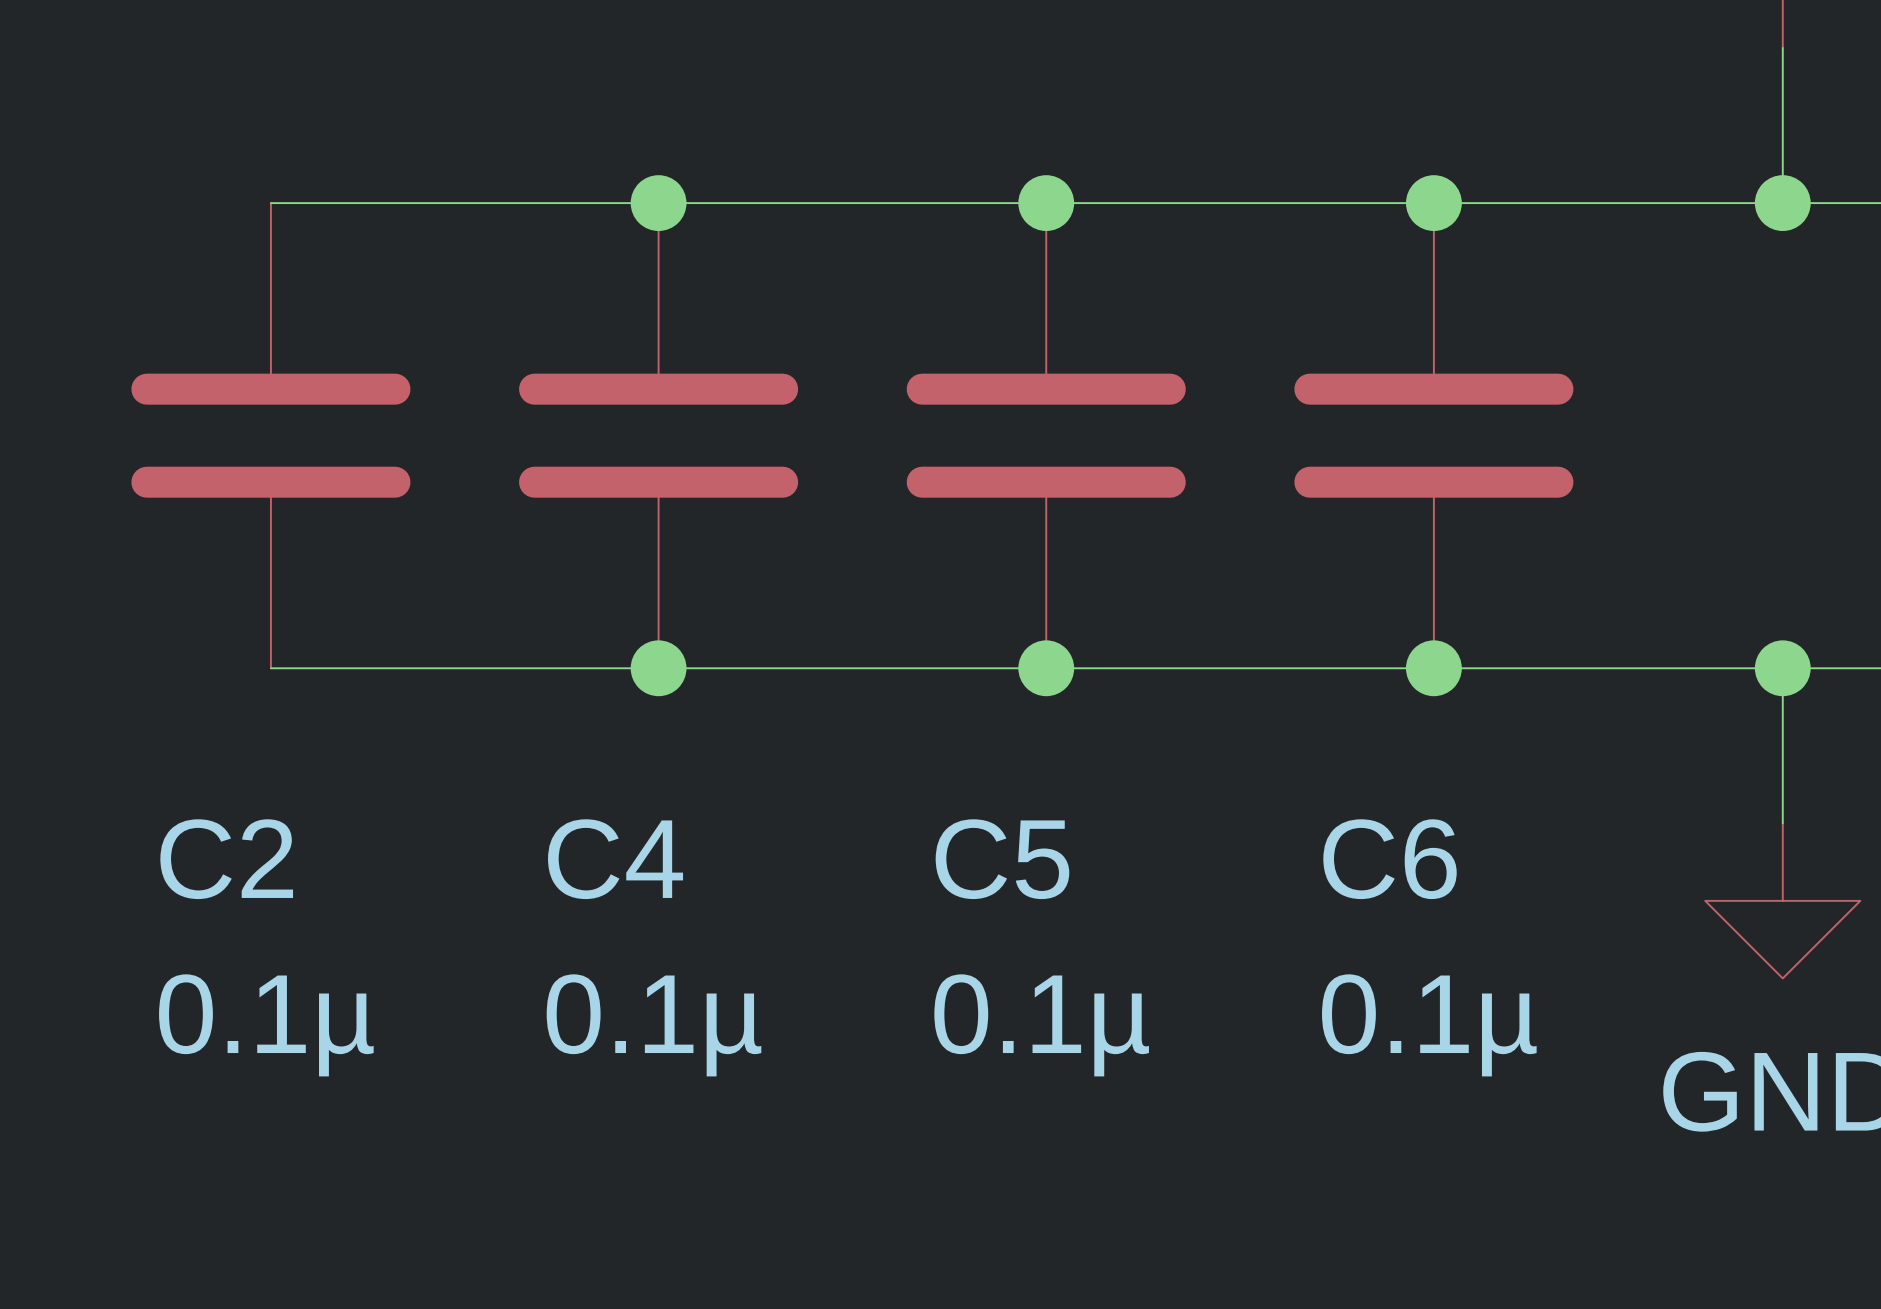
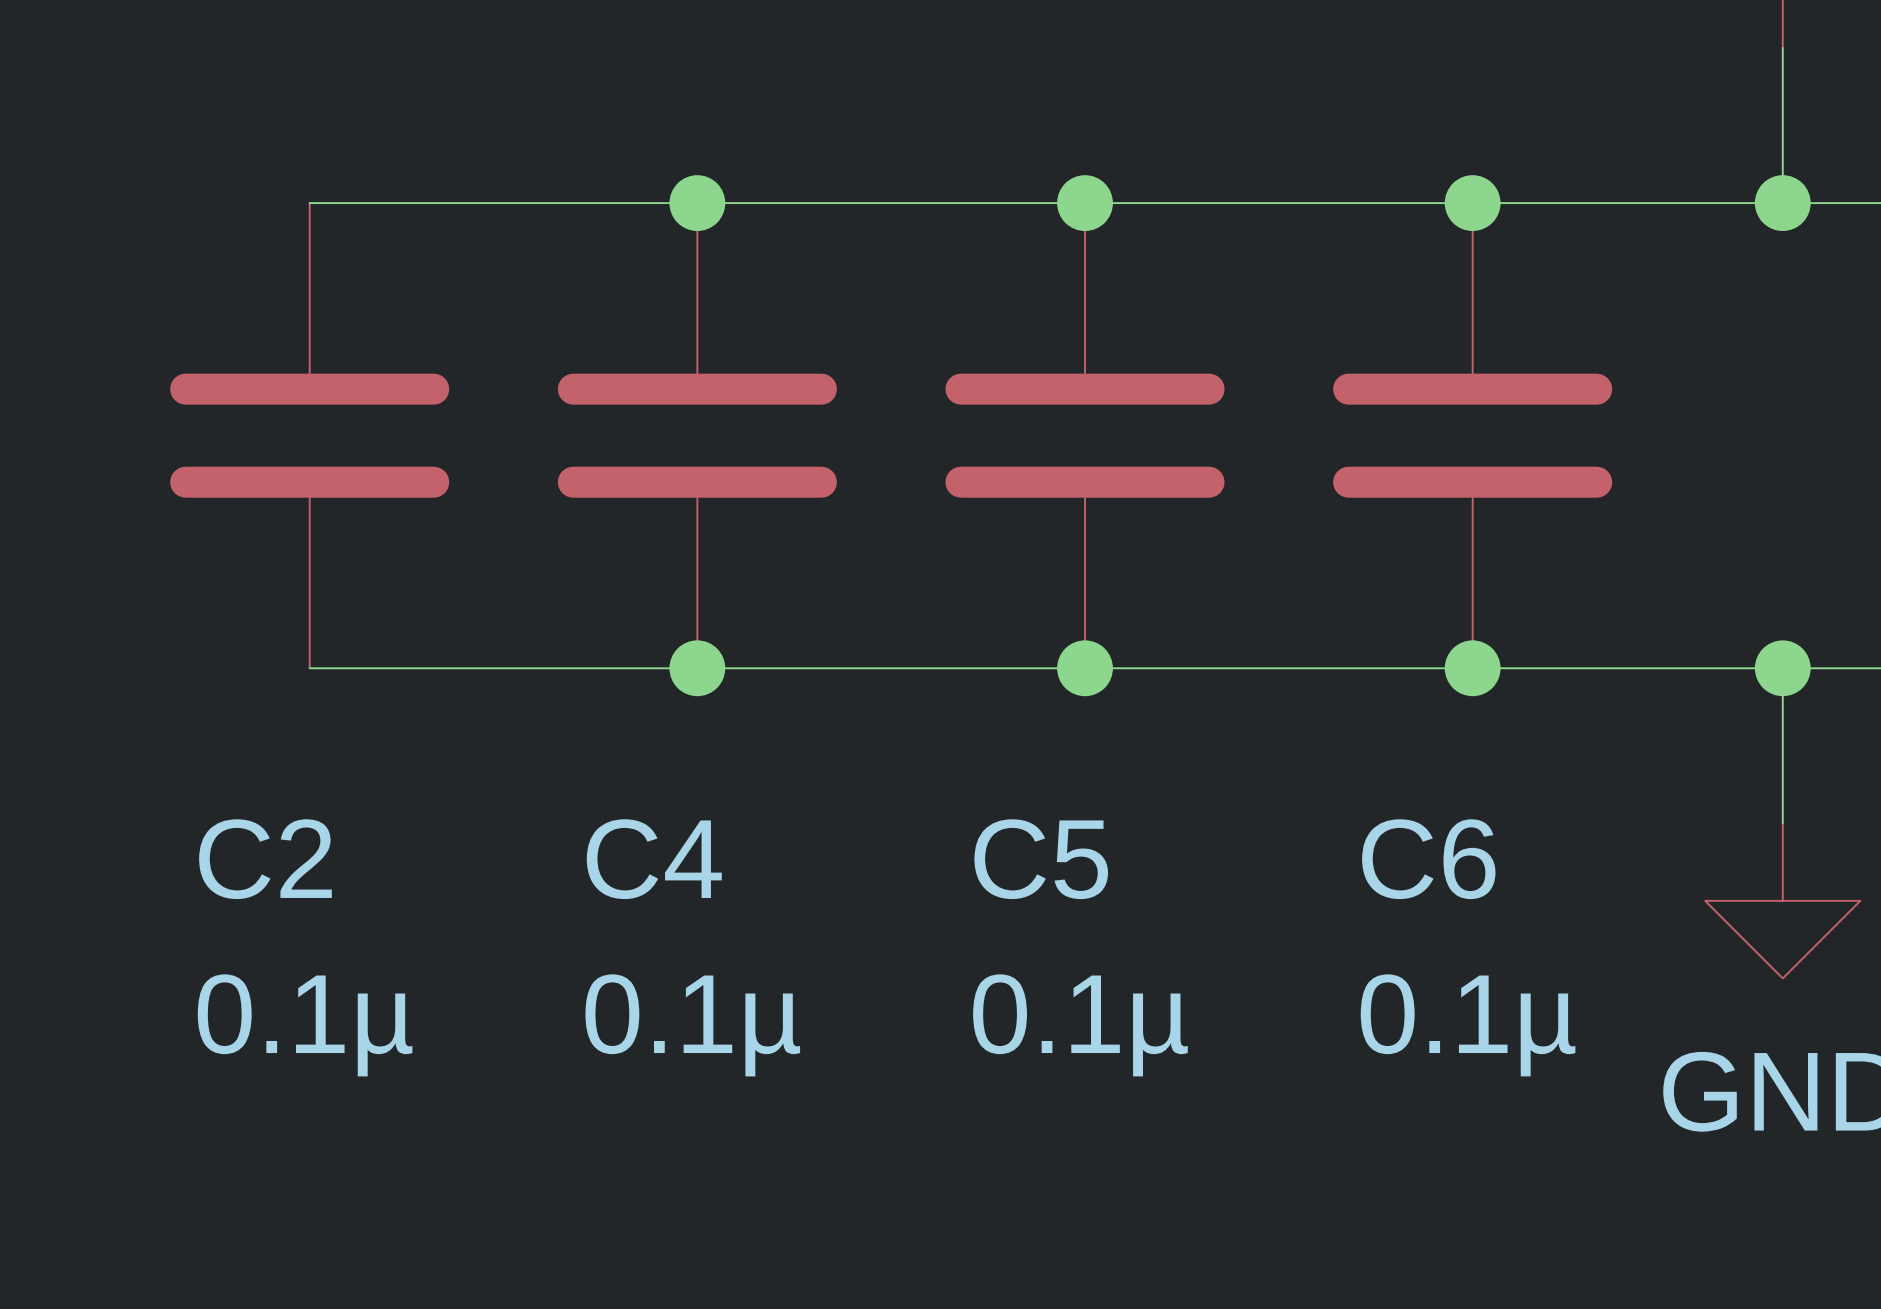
wire: (270, 203) (309, 203) -> none
junction position: (658, 203) -> (697, 203)
junction position: (1046, 203) -> (1085, 203)
junction position: (1433, 203) -> (1472, 203)
C2 position: (270, 435) -> (309, 435)
C4 position: (658, 435) -> (697, 435)
C5 position: (1046, 435) -> (1085, 435)
C6 position: (1433, 435) -> (1472, 435)
wire: (270, 668) (309, 668) -> none
junction position: (658, 668) -> (697, 668)
junction position: (1046, 668) -> (1085, 668)
junction position: (1433, 668) -> (1472, 668)

